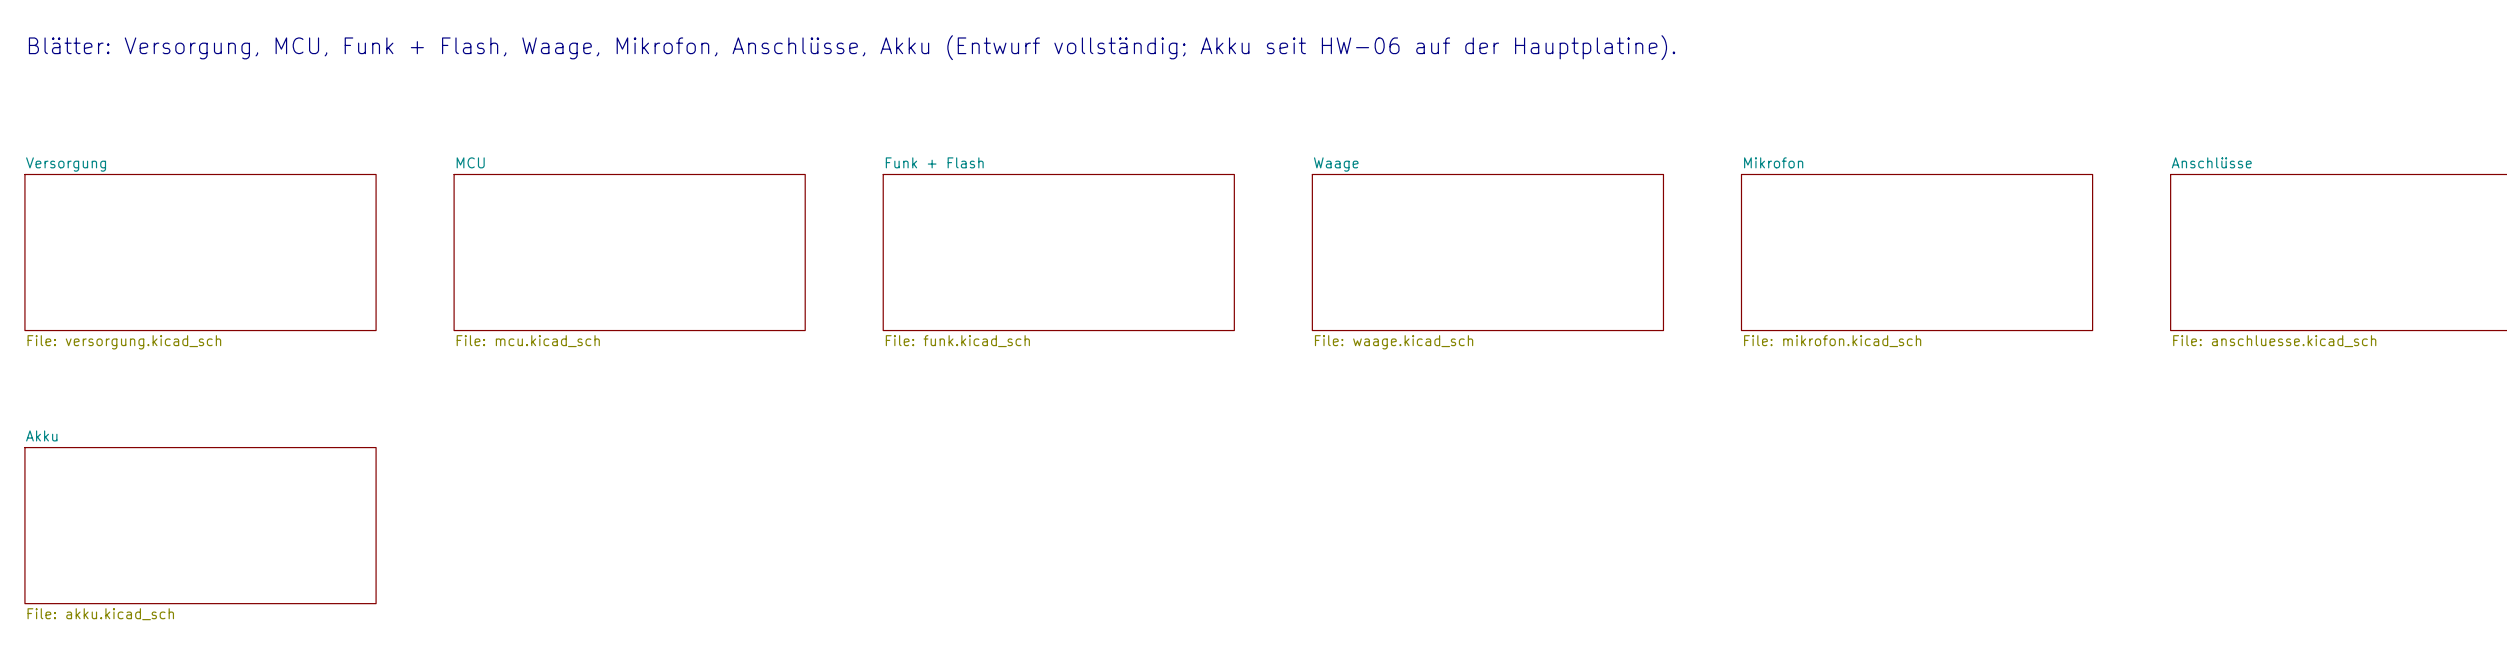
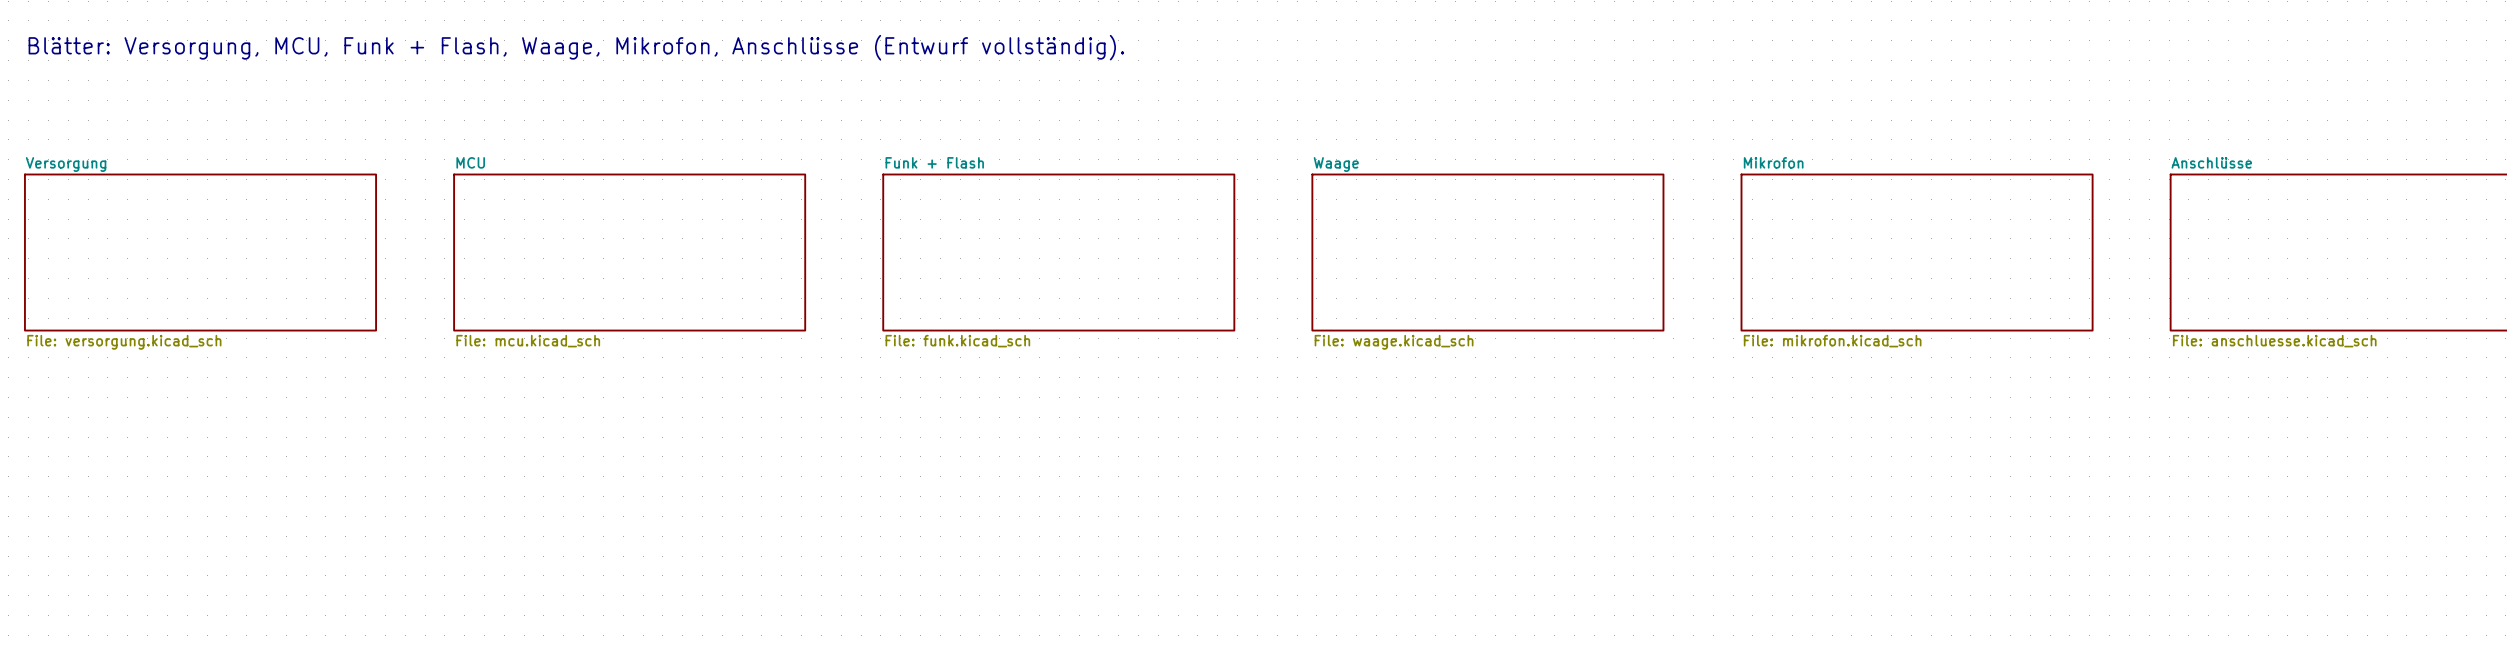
text: Blätter: Versorgung, MCU, Funk + Flash, Waage, Mikrofon, Anschlüsse, Akku (Entwurf vollständig; Akku seit HW-06 auf der Hauptplatine). (852, 47) -> Blätter: Versorgung, MCU, Funk + Flash, Waage, Mikrofon, Anschlüsse (Entwurf vollständig). (576, 47)
sheet Akku: File: akku.kicad_sch (200, 525) -> none

